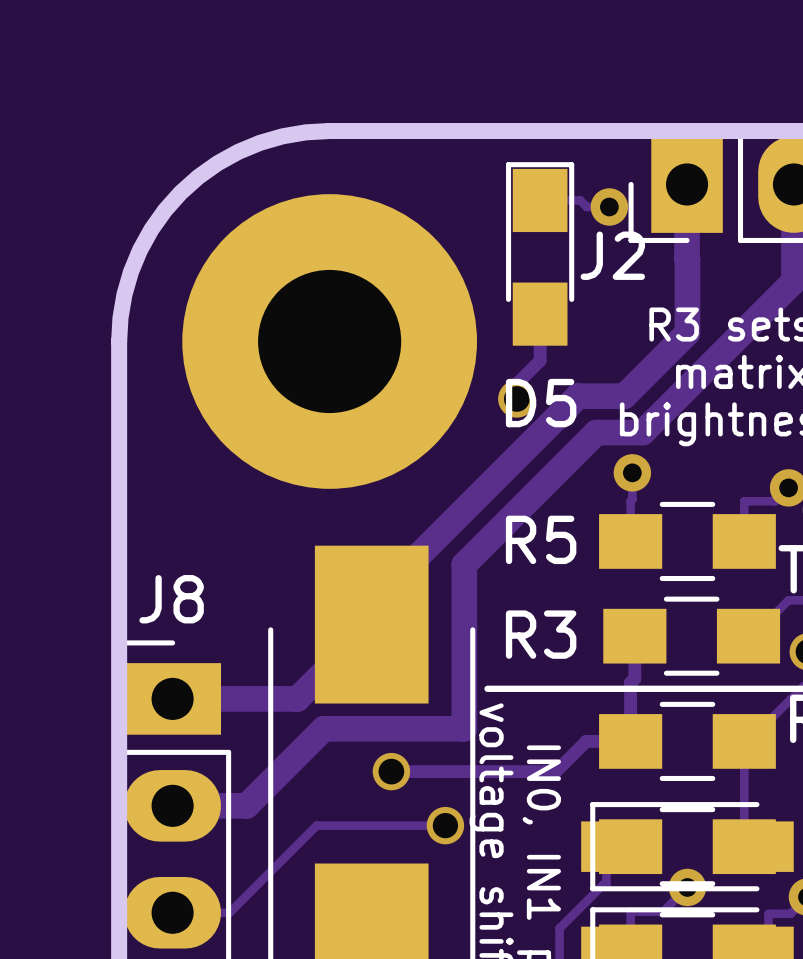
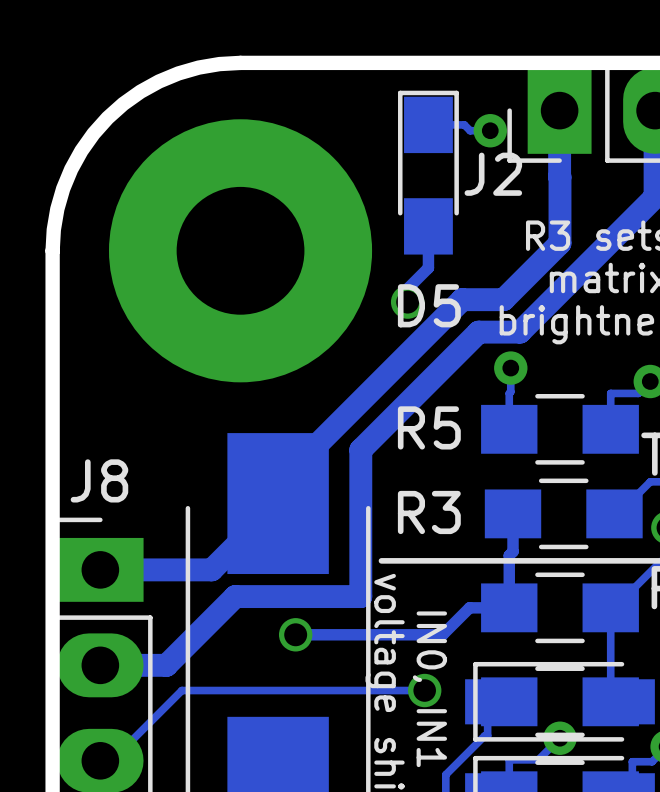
track: (445, 825) (316, 825) (229, 912) (185, 912) -> (424, 690) (181, 690) (111, 760)
via position: (445, 825) -> (424, 690)

